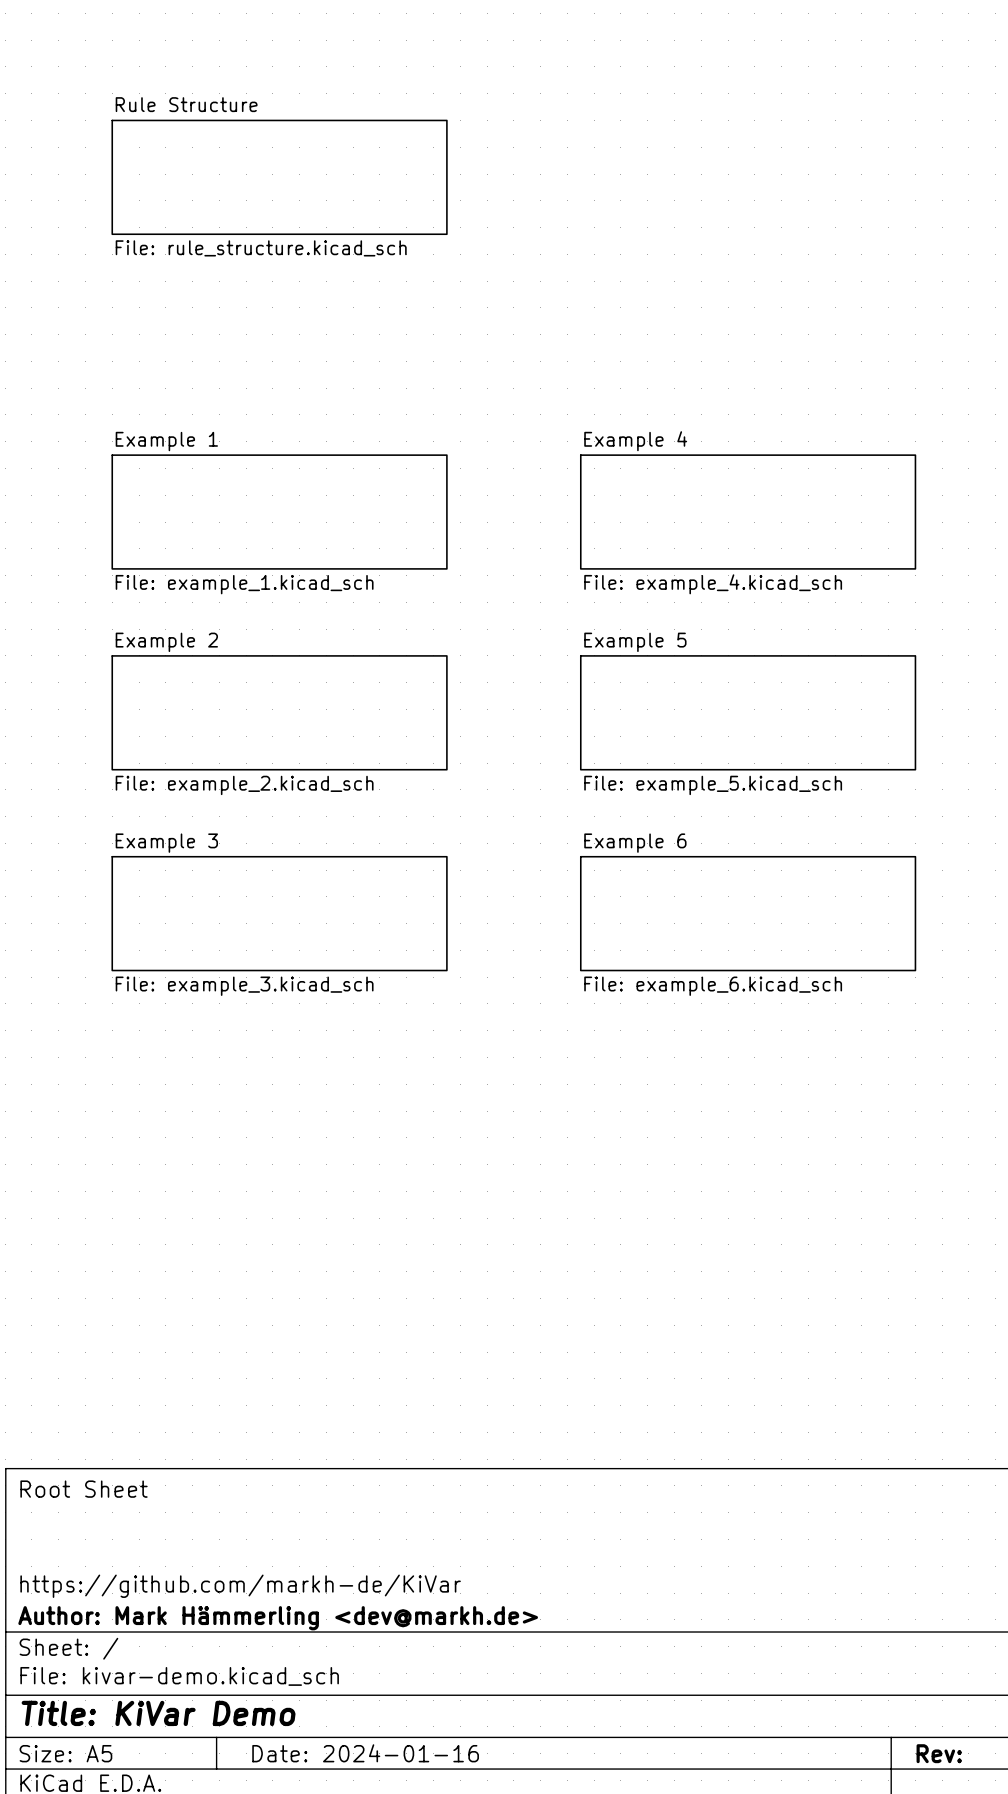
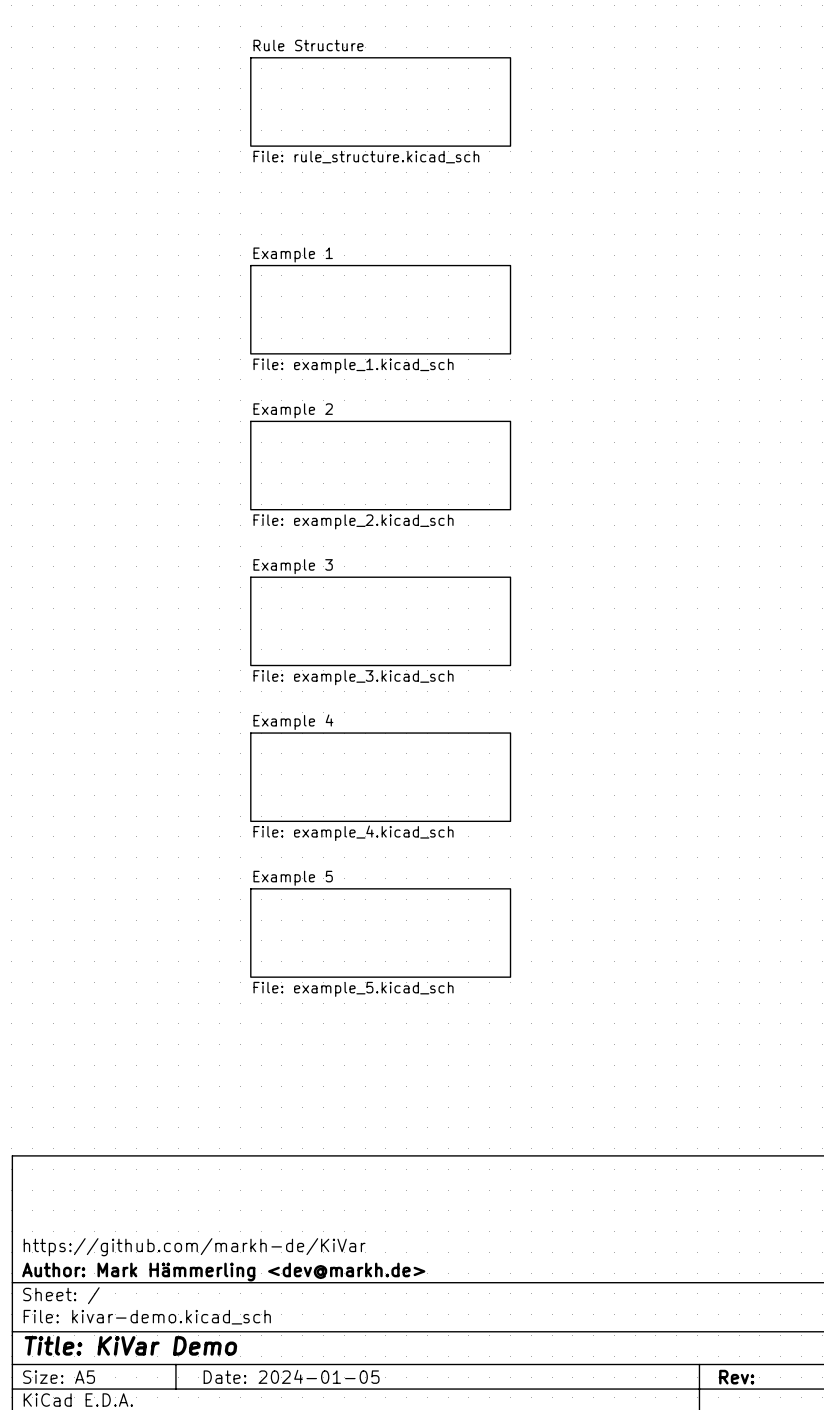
sheet Rule Structure position: (279, 177) -> (380, 101)
sheet Example 1 position: (279, 512) -> (380, 309)
sheet Example 4 position: (748, 512) -> (380, 777)
sheet Example 2 position: (279, 712) -> (380, 465)
sheet Example 5 position: (748, 712) -> (380, 933)
sheet Example 3 position: (279, 913) -> (380, 621)
sheet Example 6: File: example_6.kicad_sch (748, 913) -> none
title block: Root Sheet (84, 1489) -> none
title block: Date: 2024-01-16 (365, 1753) -> Date: 2024-01-05 (291, 1376)

